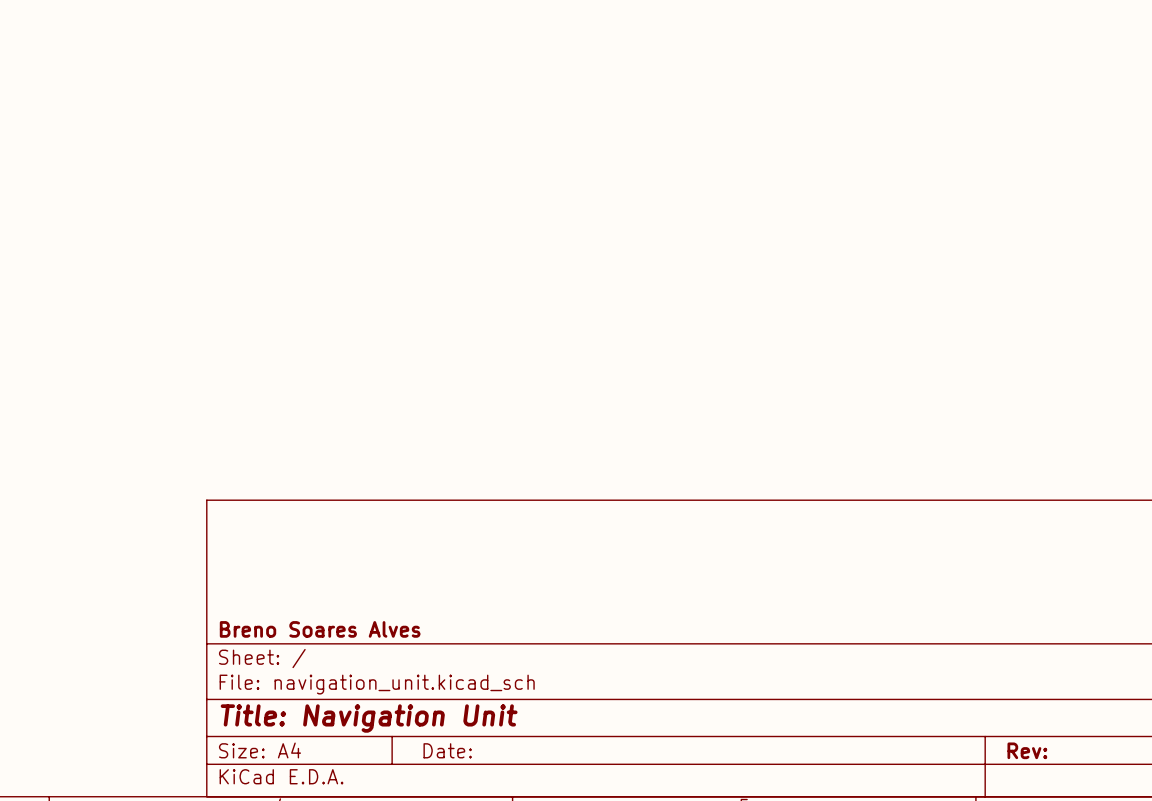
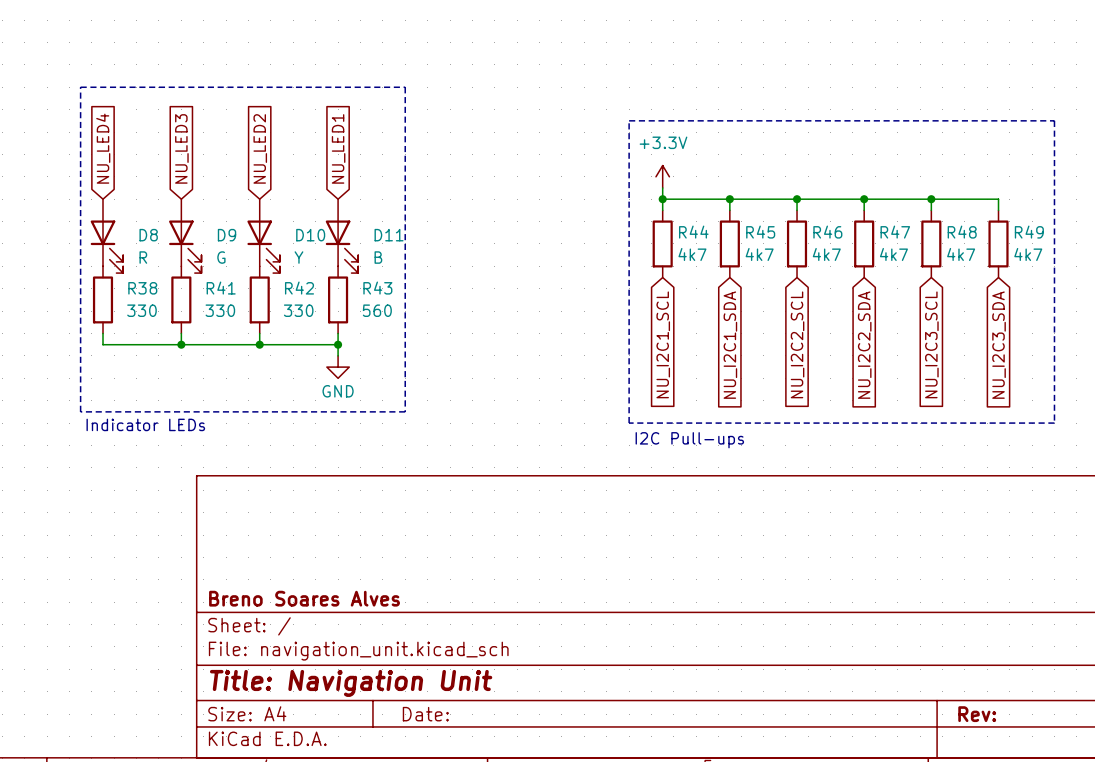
line: none -> (80, 87) (405, 87) (405, 411) (80, 411) (80, 87)
line: none -> (629, 120) (1054, 120) (1054, 423) (629, 423) (629, 120)
global label: none -> NU_LED4 (103, 148)
global label: none -> NU_LED3 (181, 148)
global label: none -> NU_LED2 (260, 148)
global label: none -> NU_LED1 (338, 148)
power symbol: none -> +3.3V (662, 176)
wire: none -> (662, 188) (662, 210)
wire: none -> (662, 199) (998, 199) (998, 210)
junction: none -> (662, 199)
wire: none -> (729, 199) (729, 210)
junction: none -> (729, 199)
wire: none -> (797, 199) (797, 210)
junction: none -> (797, 199)
wire: none -> (864, 199) (864, 210)
junction: none -> (864, 199)
wire: none -> (931, 199) (931, 210)
junction: none -> (931, 199)
D8: none -> R (106, 236)
D9: none -> G (185, 236)
D10: none -> Y (263, 236)
D11: none -> B (341, 236)
R44: none -> 4k7 (662, 243)
R45: none -> 4k7 (729, 243)
R46: none -> 4k7 (797, 243)
R47: none -> 4k7 (864, 243)
R48: none -> 4k7 (931, 243)
R49: none -> 4k7 (998, 243)
R38: none -> 330 (102, 299)
R41: none -> 330 (181, 299)
R42: none -> 330 (259, 299)
R43: none -> 560 (338, 299)
wire: none -> (102, 333) (102, 344) (338, 344)
wire: none -> (181, 333) (181, 344)
wire: none -> (259, 333) (259, 344)
wire: none -> (338, 333) (338, 355)
junction: none -> (181, 344)
junction: none -> (259, 344)
junction: none -> (338, 344)
global label: none -> NU_I2C1_SCL (663, 344)
global label: none -> NU_I2C1_SDA (730, 345)
global label: none -> NU_I2C2_SCL (797, 344)
global label: none -> NU_I2C2_SDA (864, 345)
global label: none -> NU_I2C3_SCL (931, 344)
global label: none -> NU_I2C3_SDA (999, 345)
power symbol: none -> GND (338, 367)
text: none -> Indicator LEDs (145, 424)
text: none -> I2C Pull-ups (689, 440)

